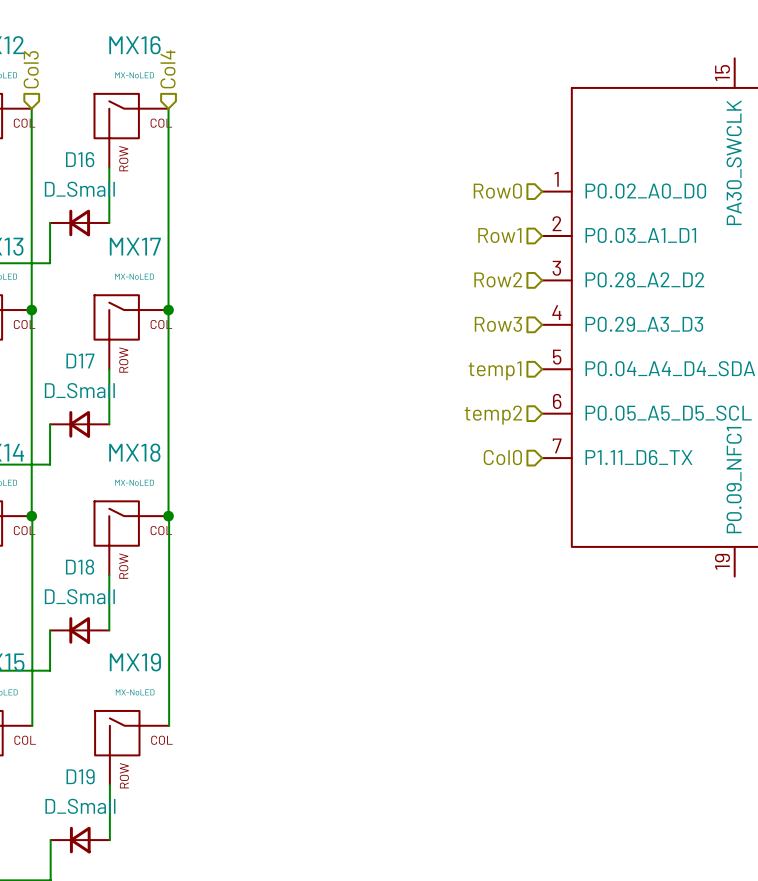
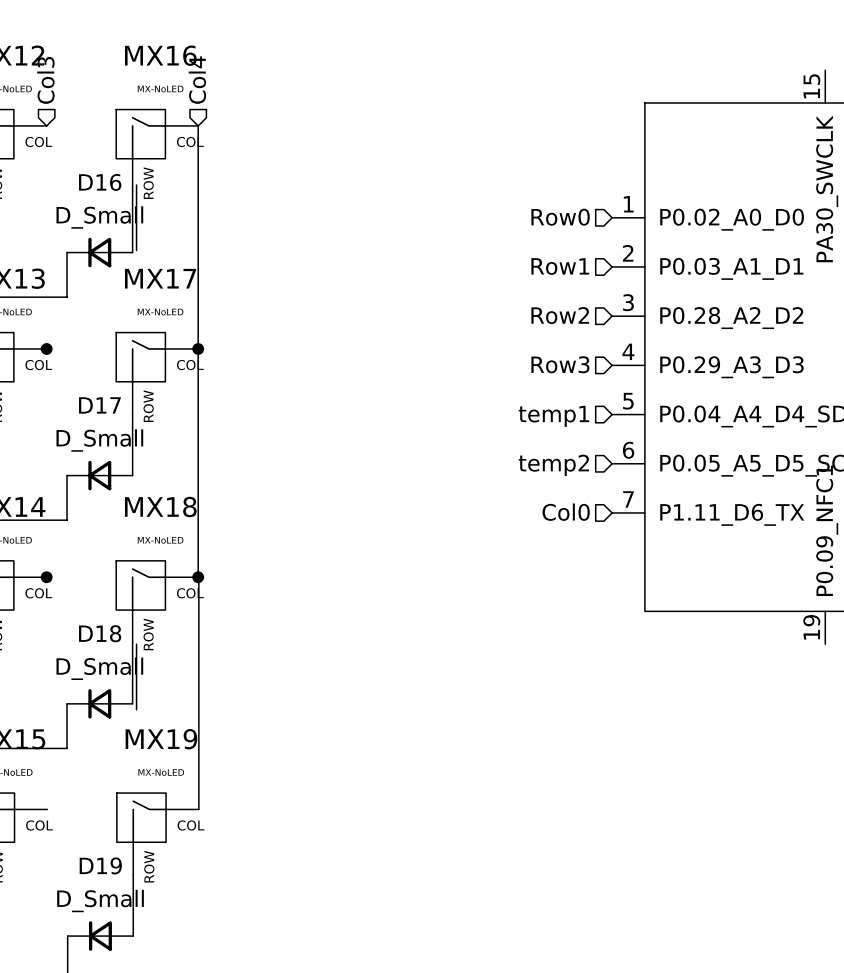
wire: (31, 108) (32, 725) -> none
wire: none -> (136, 184) (136, 250)
wire: none -> (136, 644) (136, 709)

